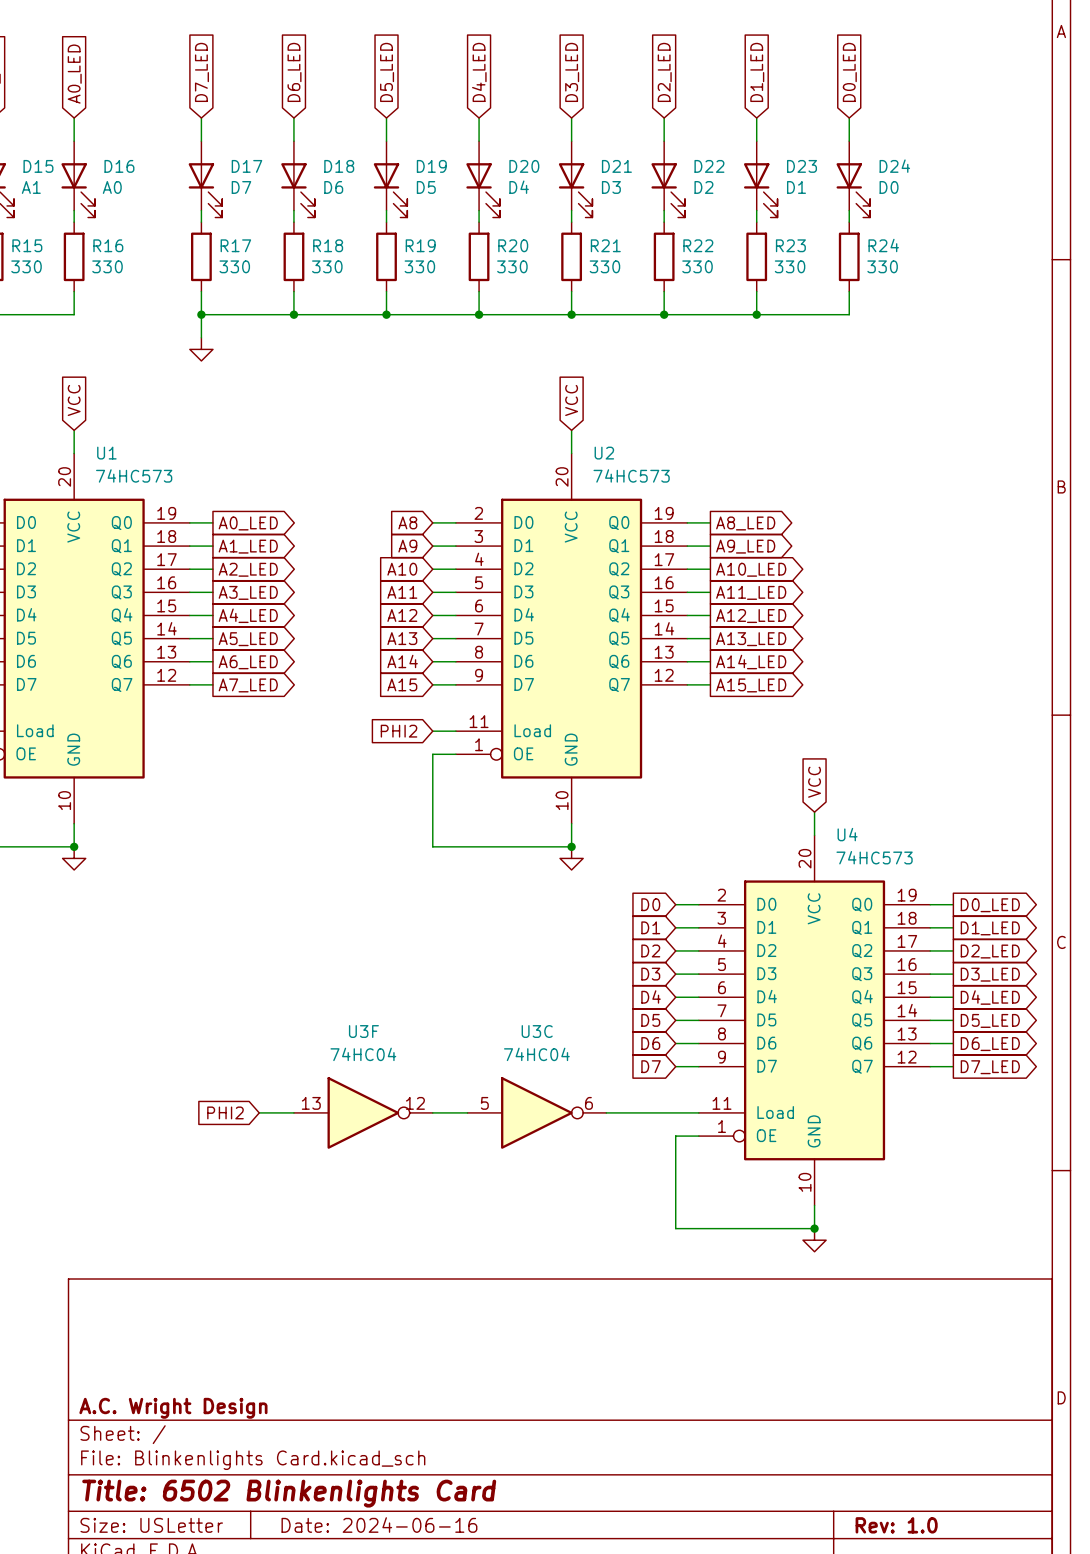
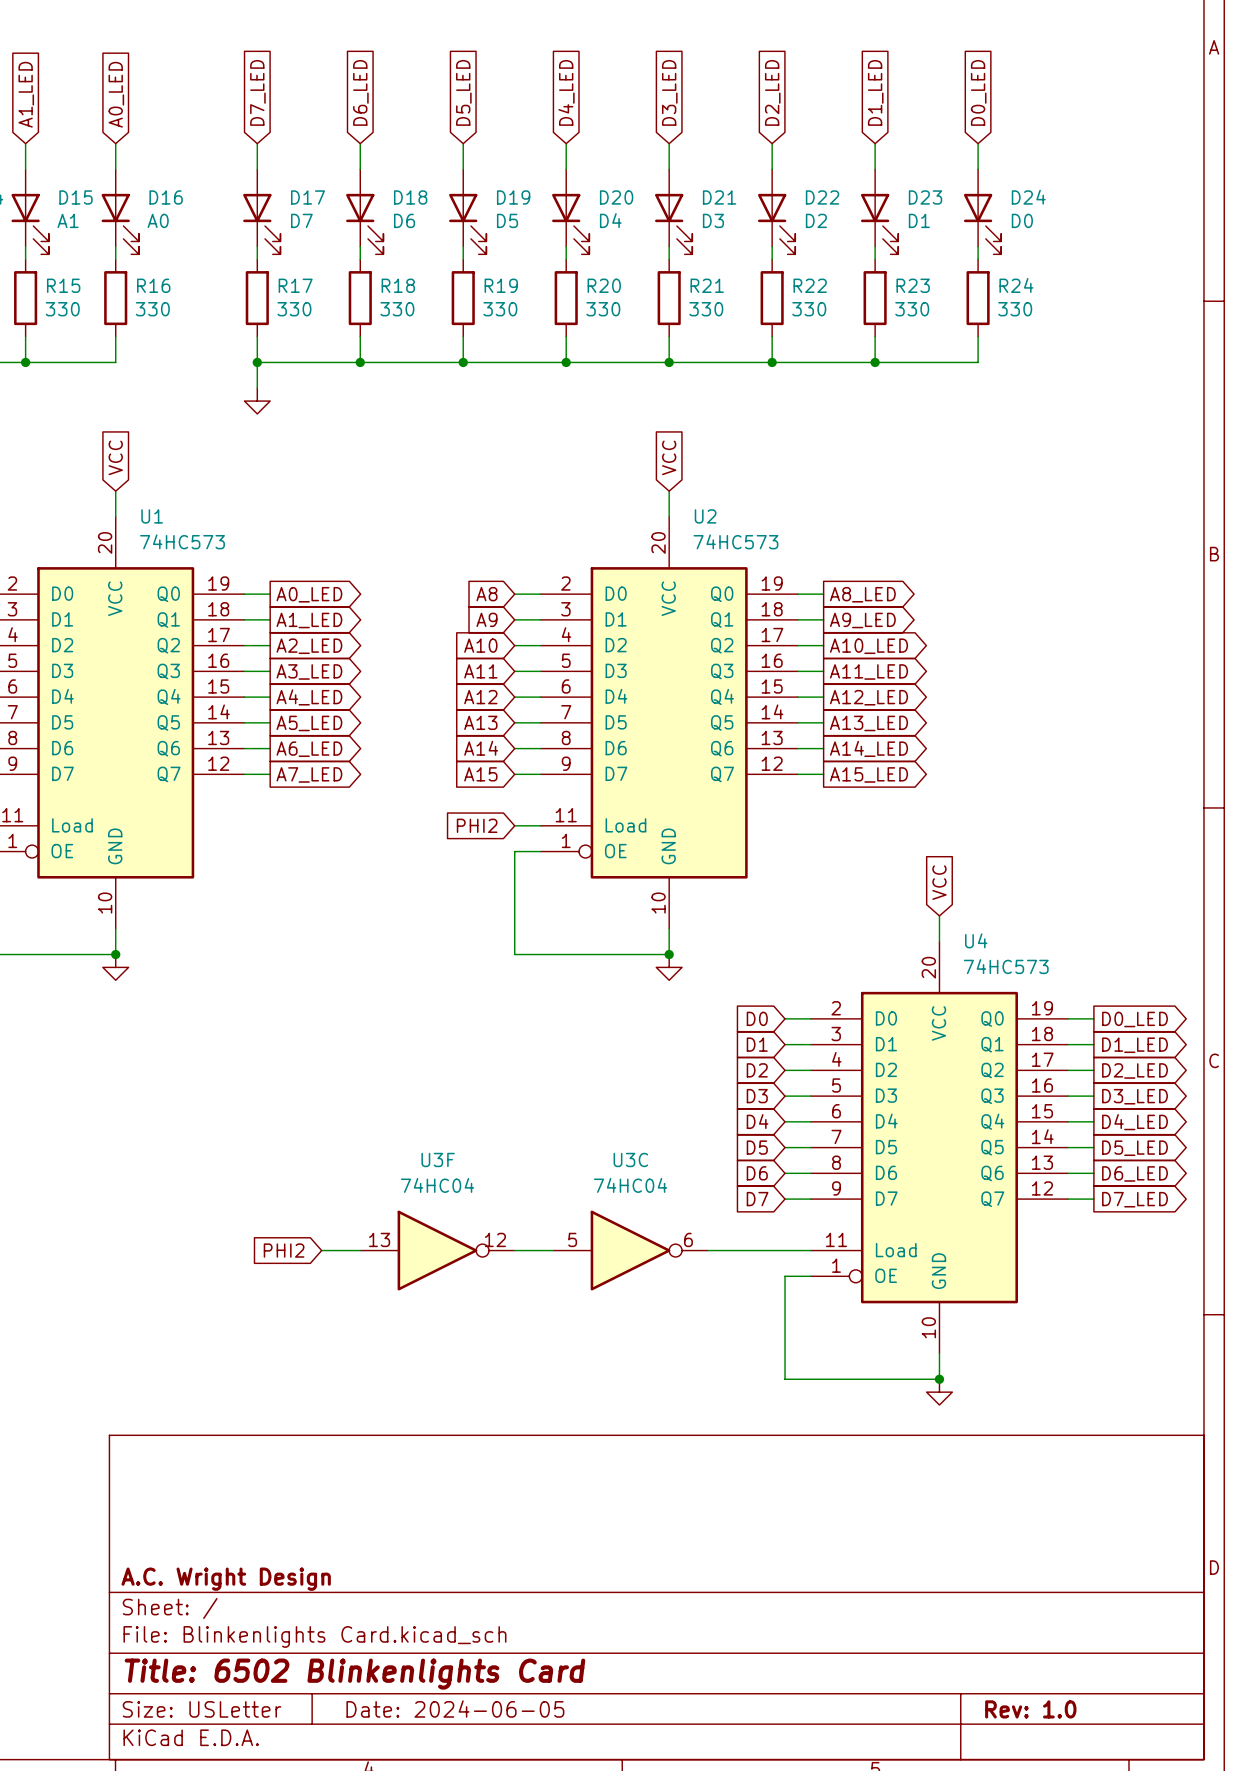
title block: Date: 2024-06-16 (379, 1525) -> Date: 2024-06-05 (455, 1709)

